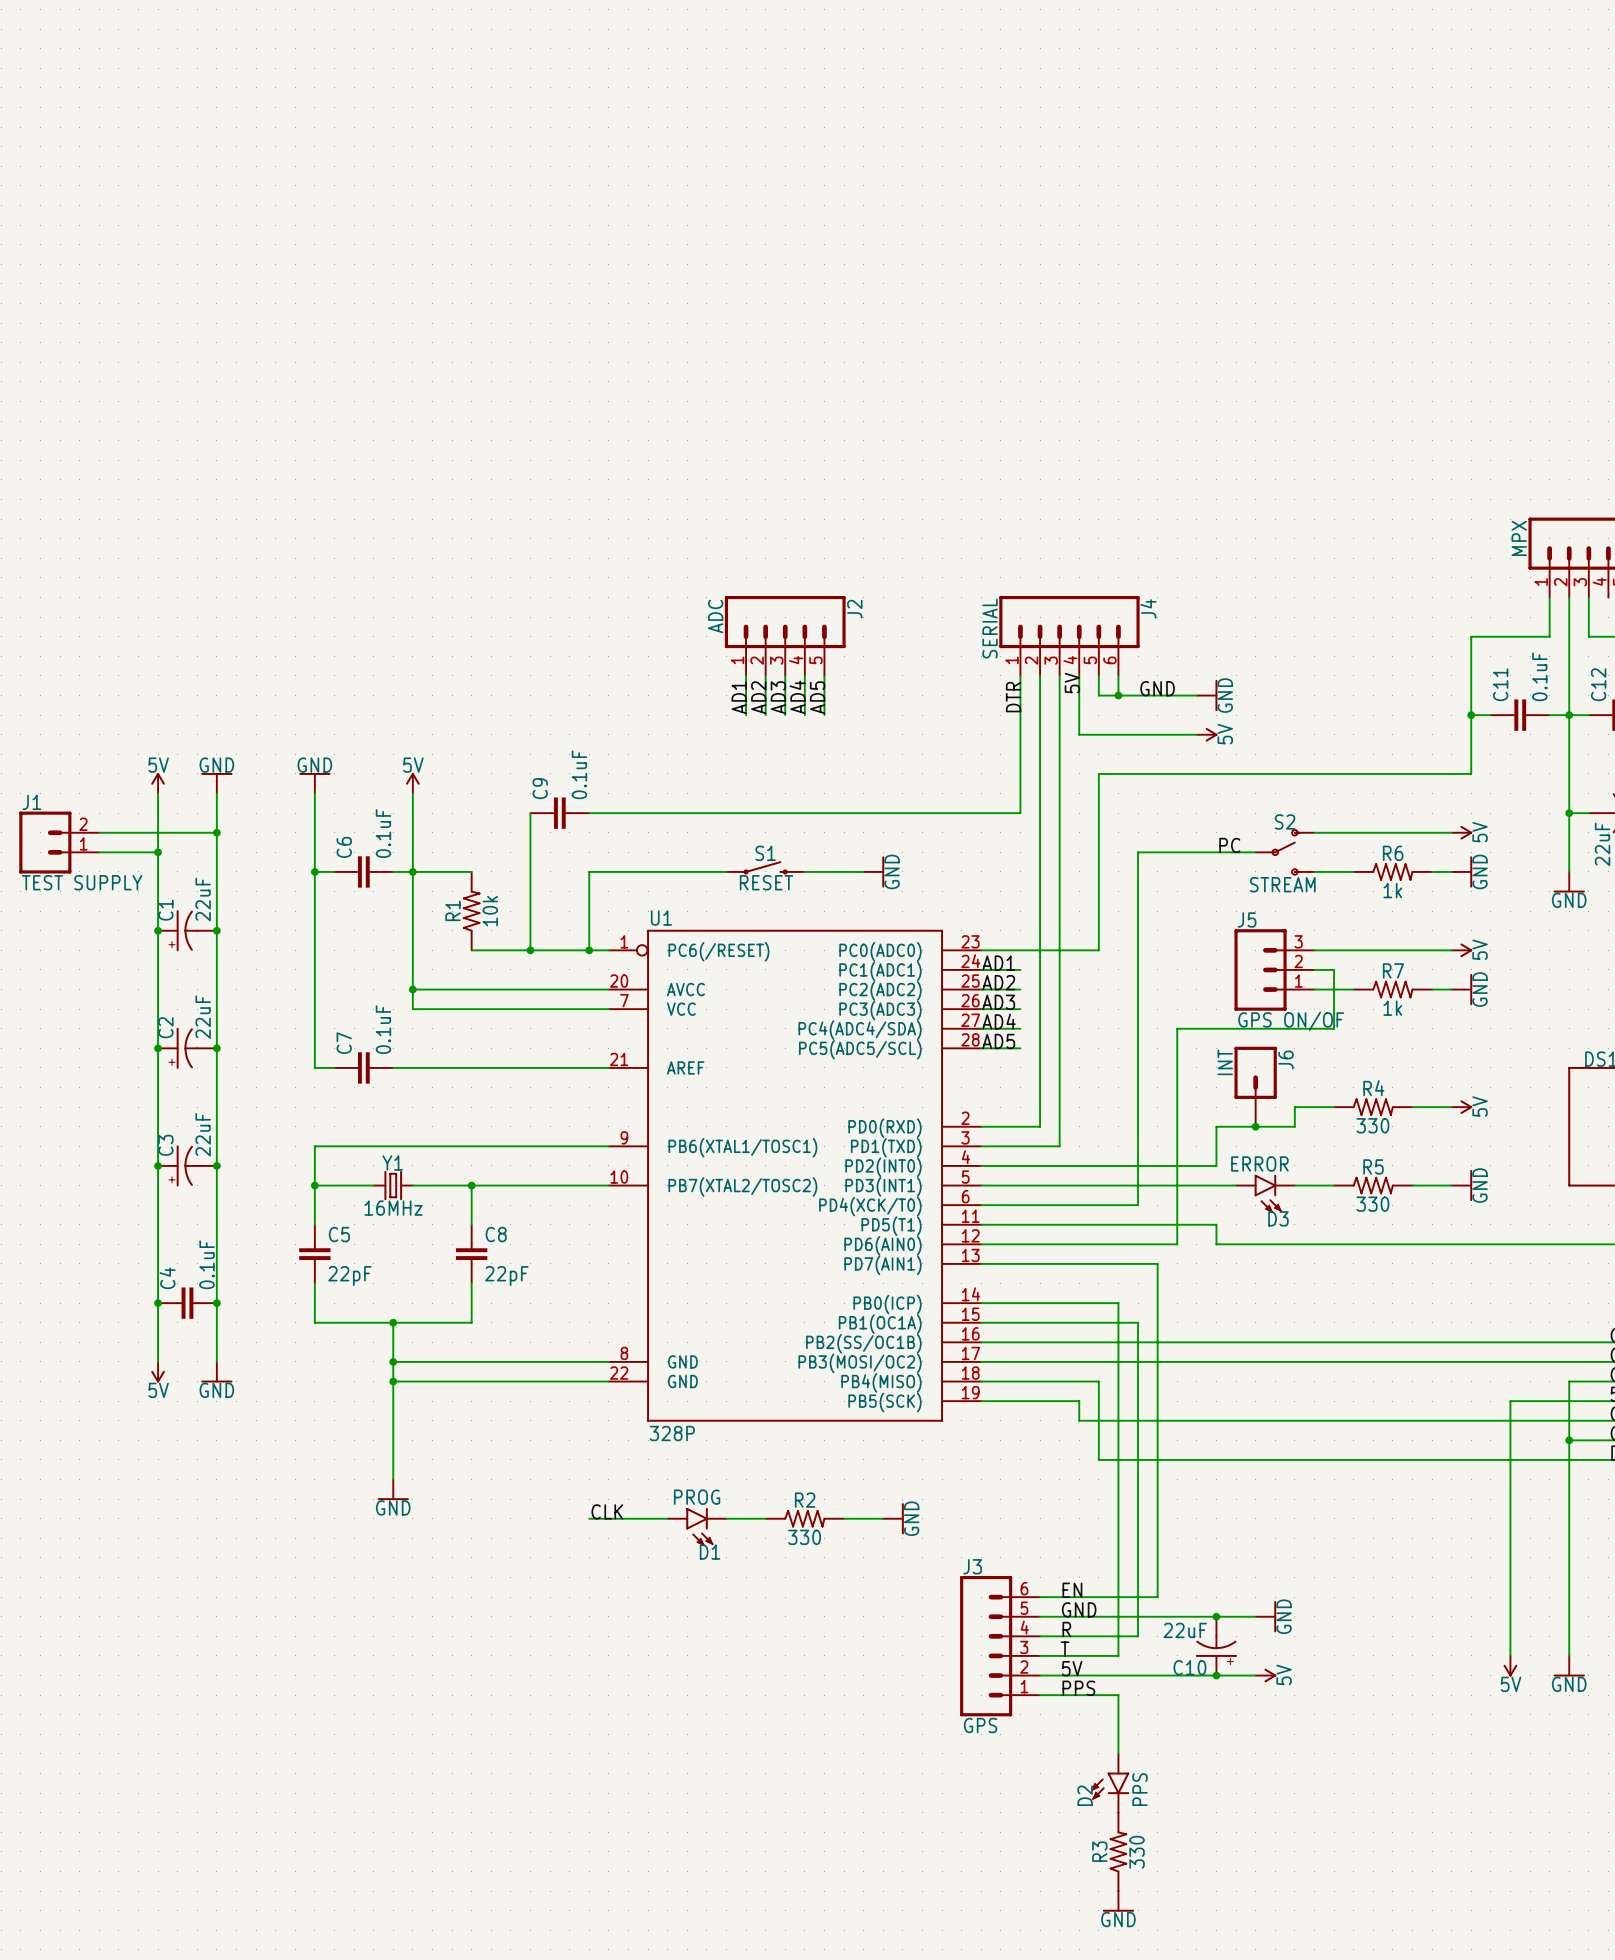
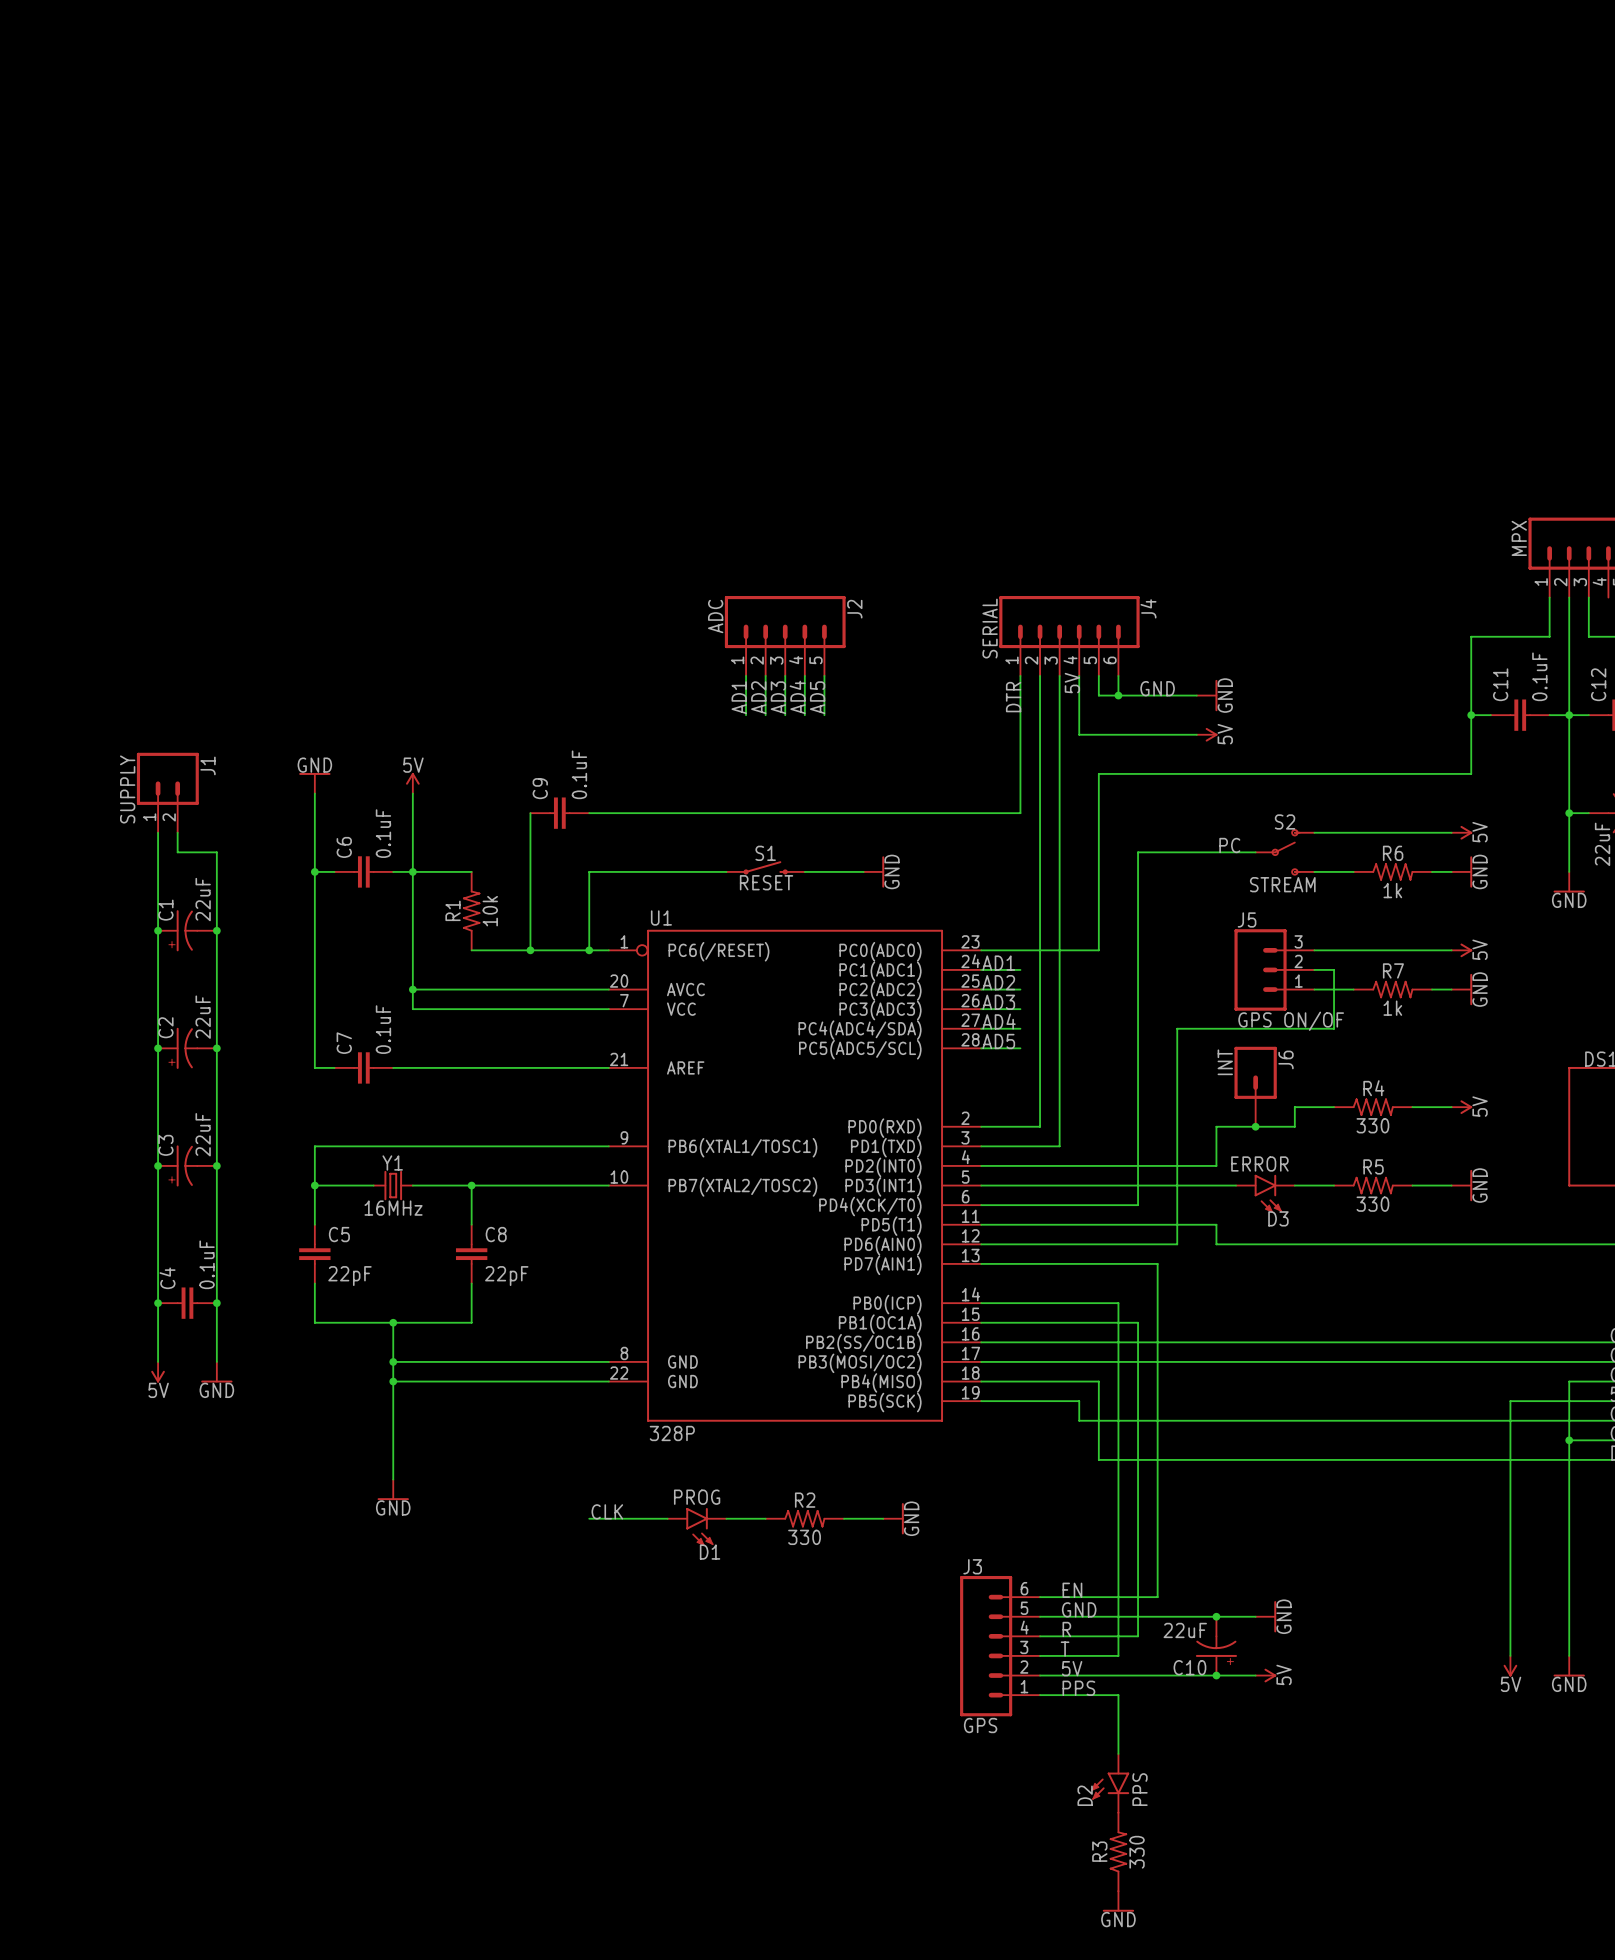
power symbol: 5V (158, 783) -> none
power symbol: GND (216, 783) -> none
wire: (216, 793) (216, 852) -> (177, 832) (177, 852) (216, 852)
wire: (99, 832) (216, 832) -> none
junction: (216, 832) -> none
J1 rotation: 0° (45, 842) -> 90° clockwise (167, 778)
J1 position: (59, 842) -> (167, 792)
wire: (99, 852) (158, 852) -> none
junction: (158, 852) -> none
J1 value: TEST SUPPLY (82, 882) -> SUPPLY (127, 789)

